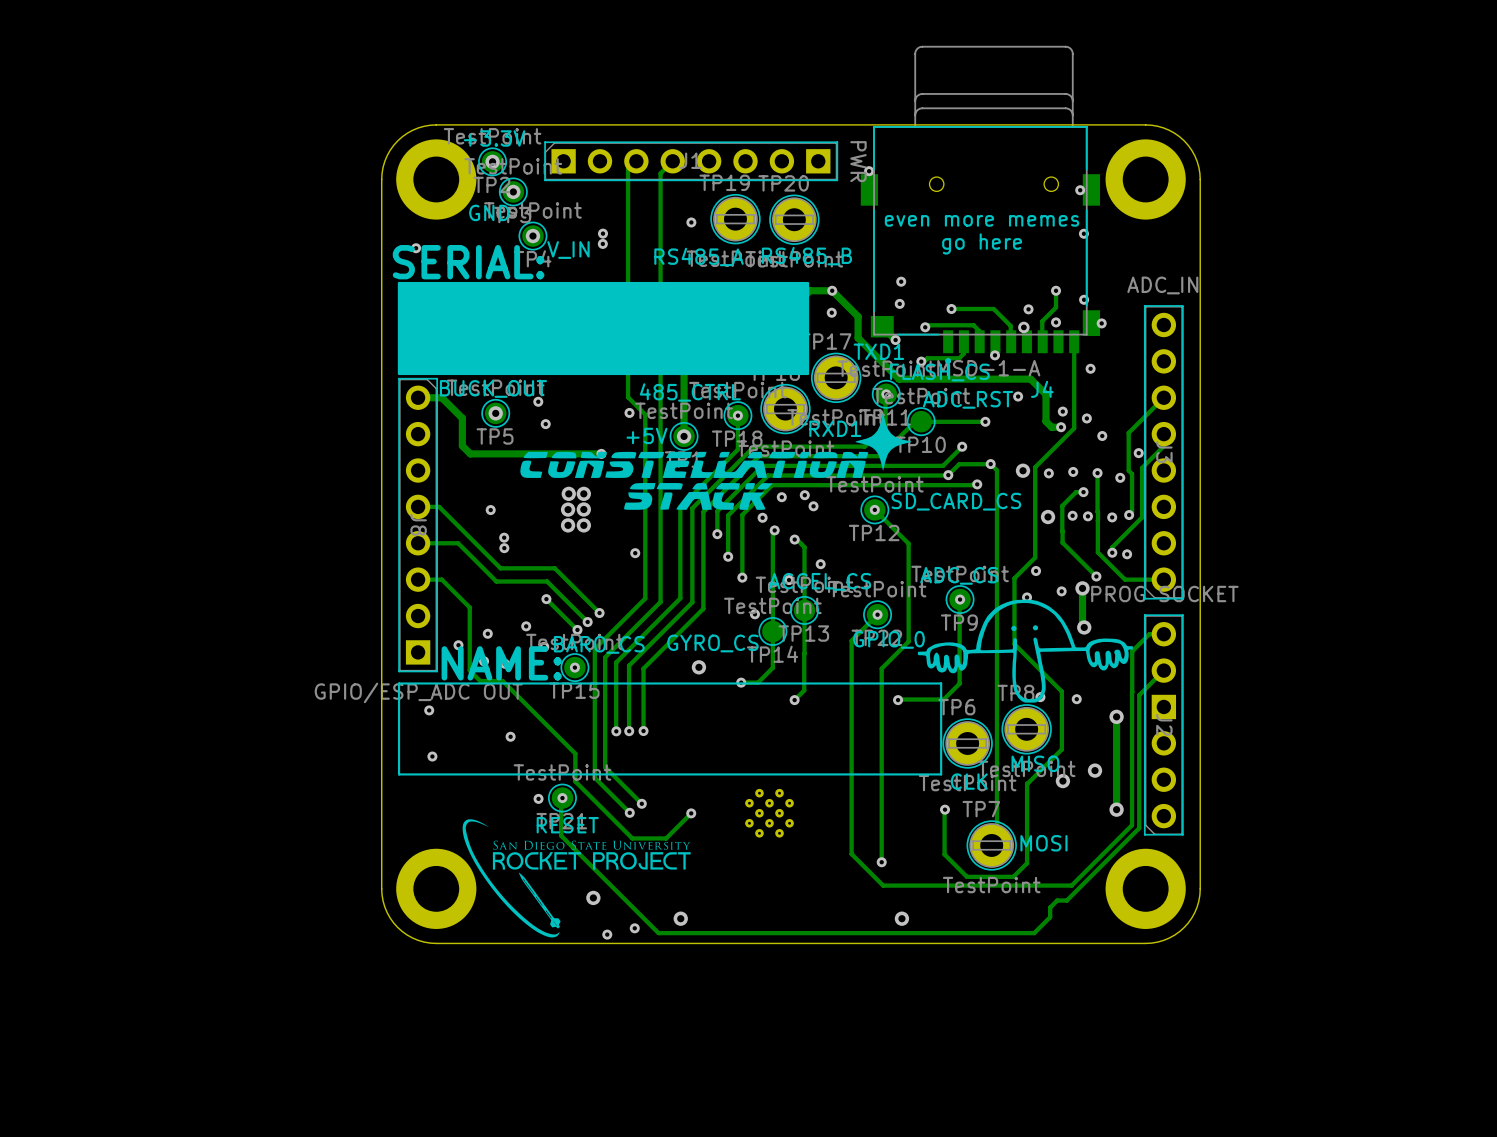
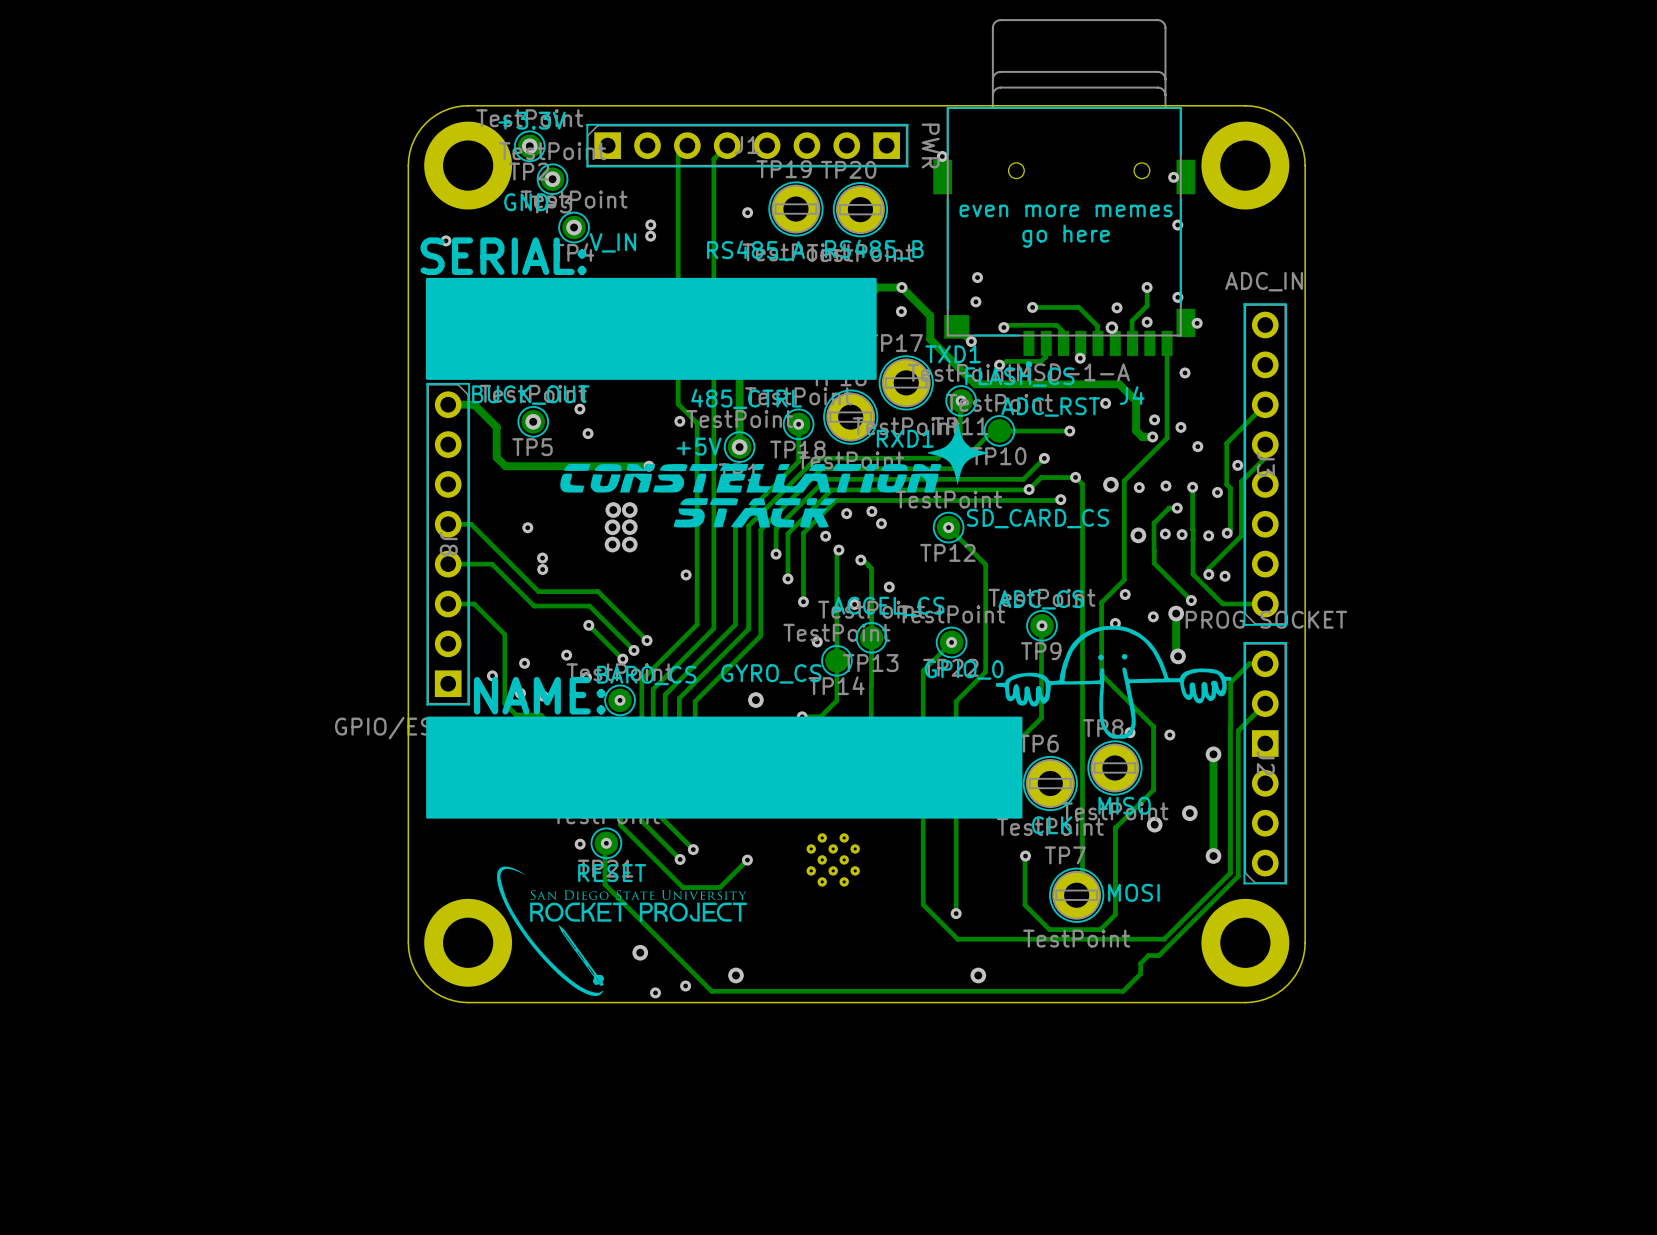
drawing: none -> [426, 716, 1023, 819]
line: (941, 683) (399, 683) (399, 774) (941, 774) (941, 683) -> none

